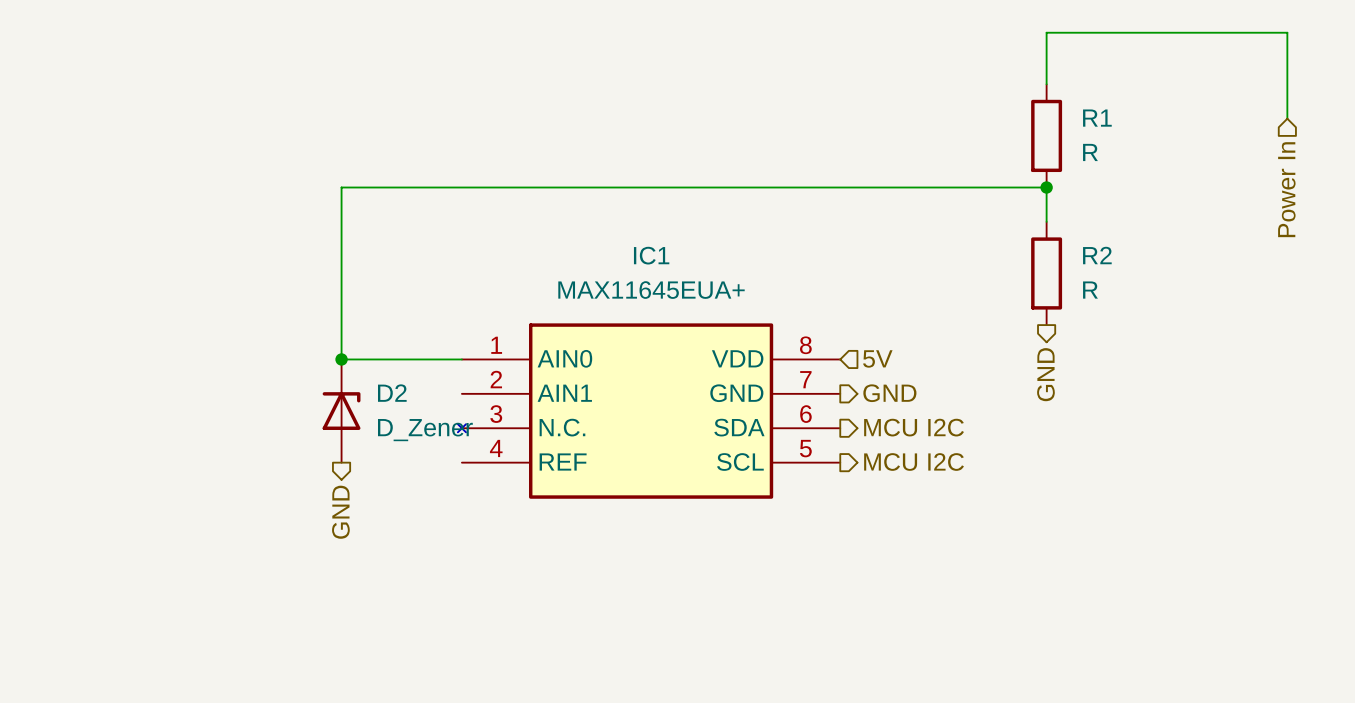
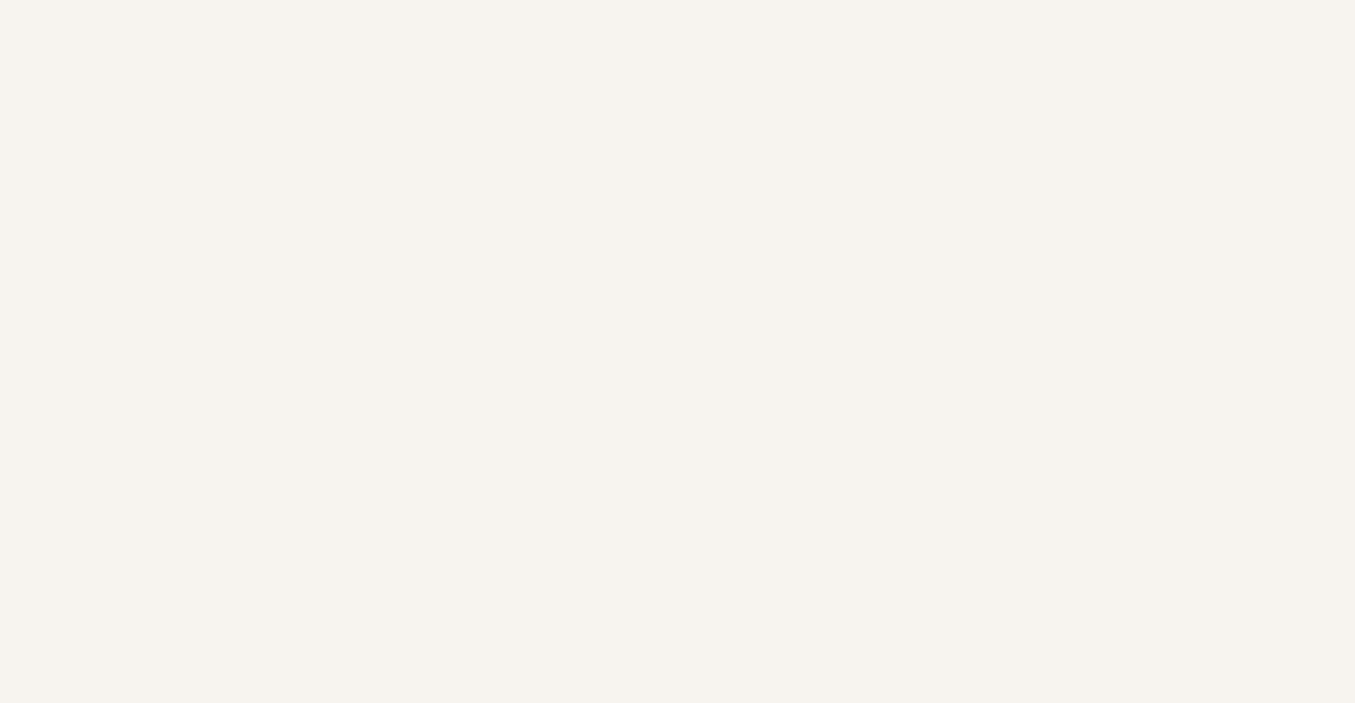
wire: (1046, 84) (1046, 32) (1287, 32) (1287, 118) -> none
R1: R (1046, 135) -> none
junction: (1046, 187) -> none
hierarchical label: Power In (1286, 189) -> none
wire: (1046, 221) (1046, 187) (341, 187) (341, 359) (461, 359) -> none
R2: R (1046, 273) -> none
hierarchical label: 5V (877, 358) -> none
junction: (341, 359) -> none
hierarchical label: GND (1045, 374) -> none
hierarchical label: GND (889, 393) -> none
D2: D_Zener (341, 411) -> none
IC1: MAX11645EUA+ (649, 411) -> none
hierarchical label: MCU I2C (914, 427) -> none
hierarchical label: MCU I2C (914, 462) -> none
hierarchical label: GND (340, 512) -> none

